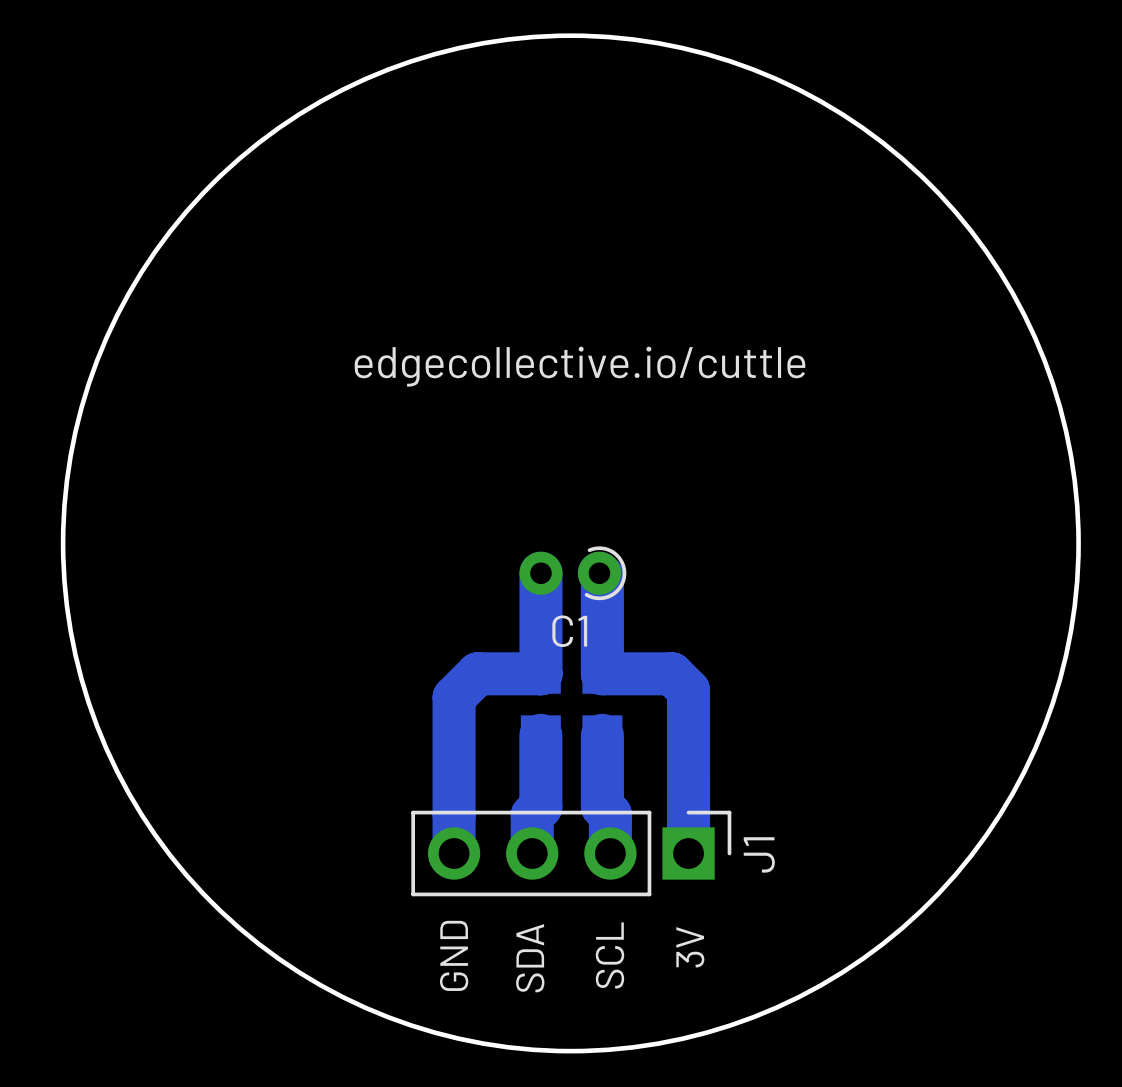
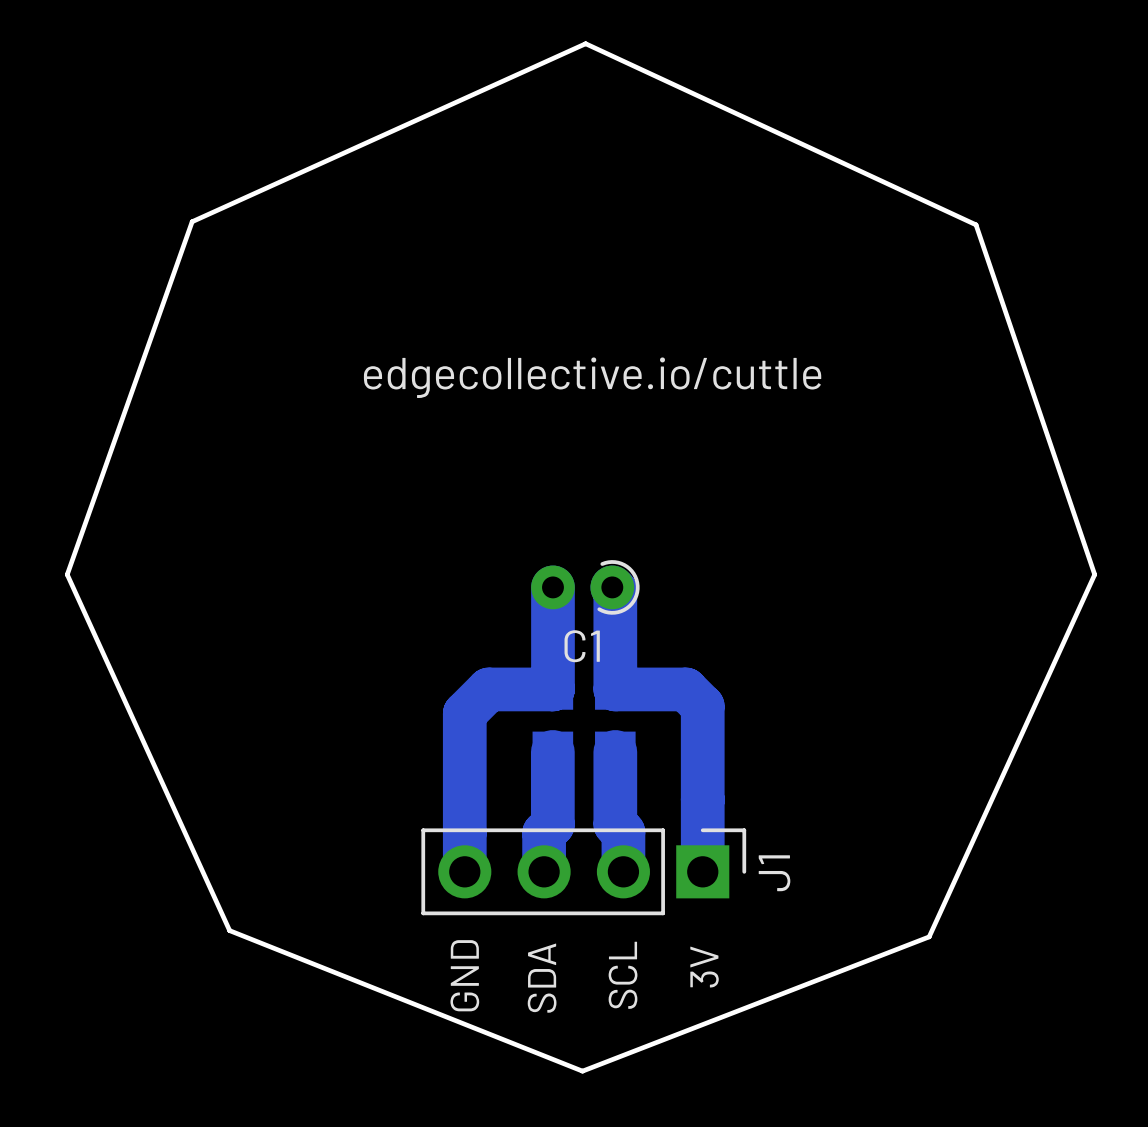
round board edge: [60, 33, 1081, 1054] -> none
board edge: none -> (585, 43) (192, 221) (67, 574) (229, 930) (582, 1071) (929, 936) (1094, 574) (976, 224) (585, 43)

